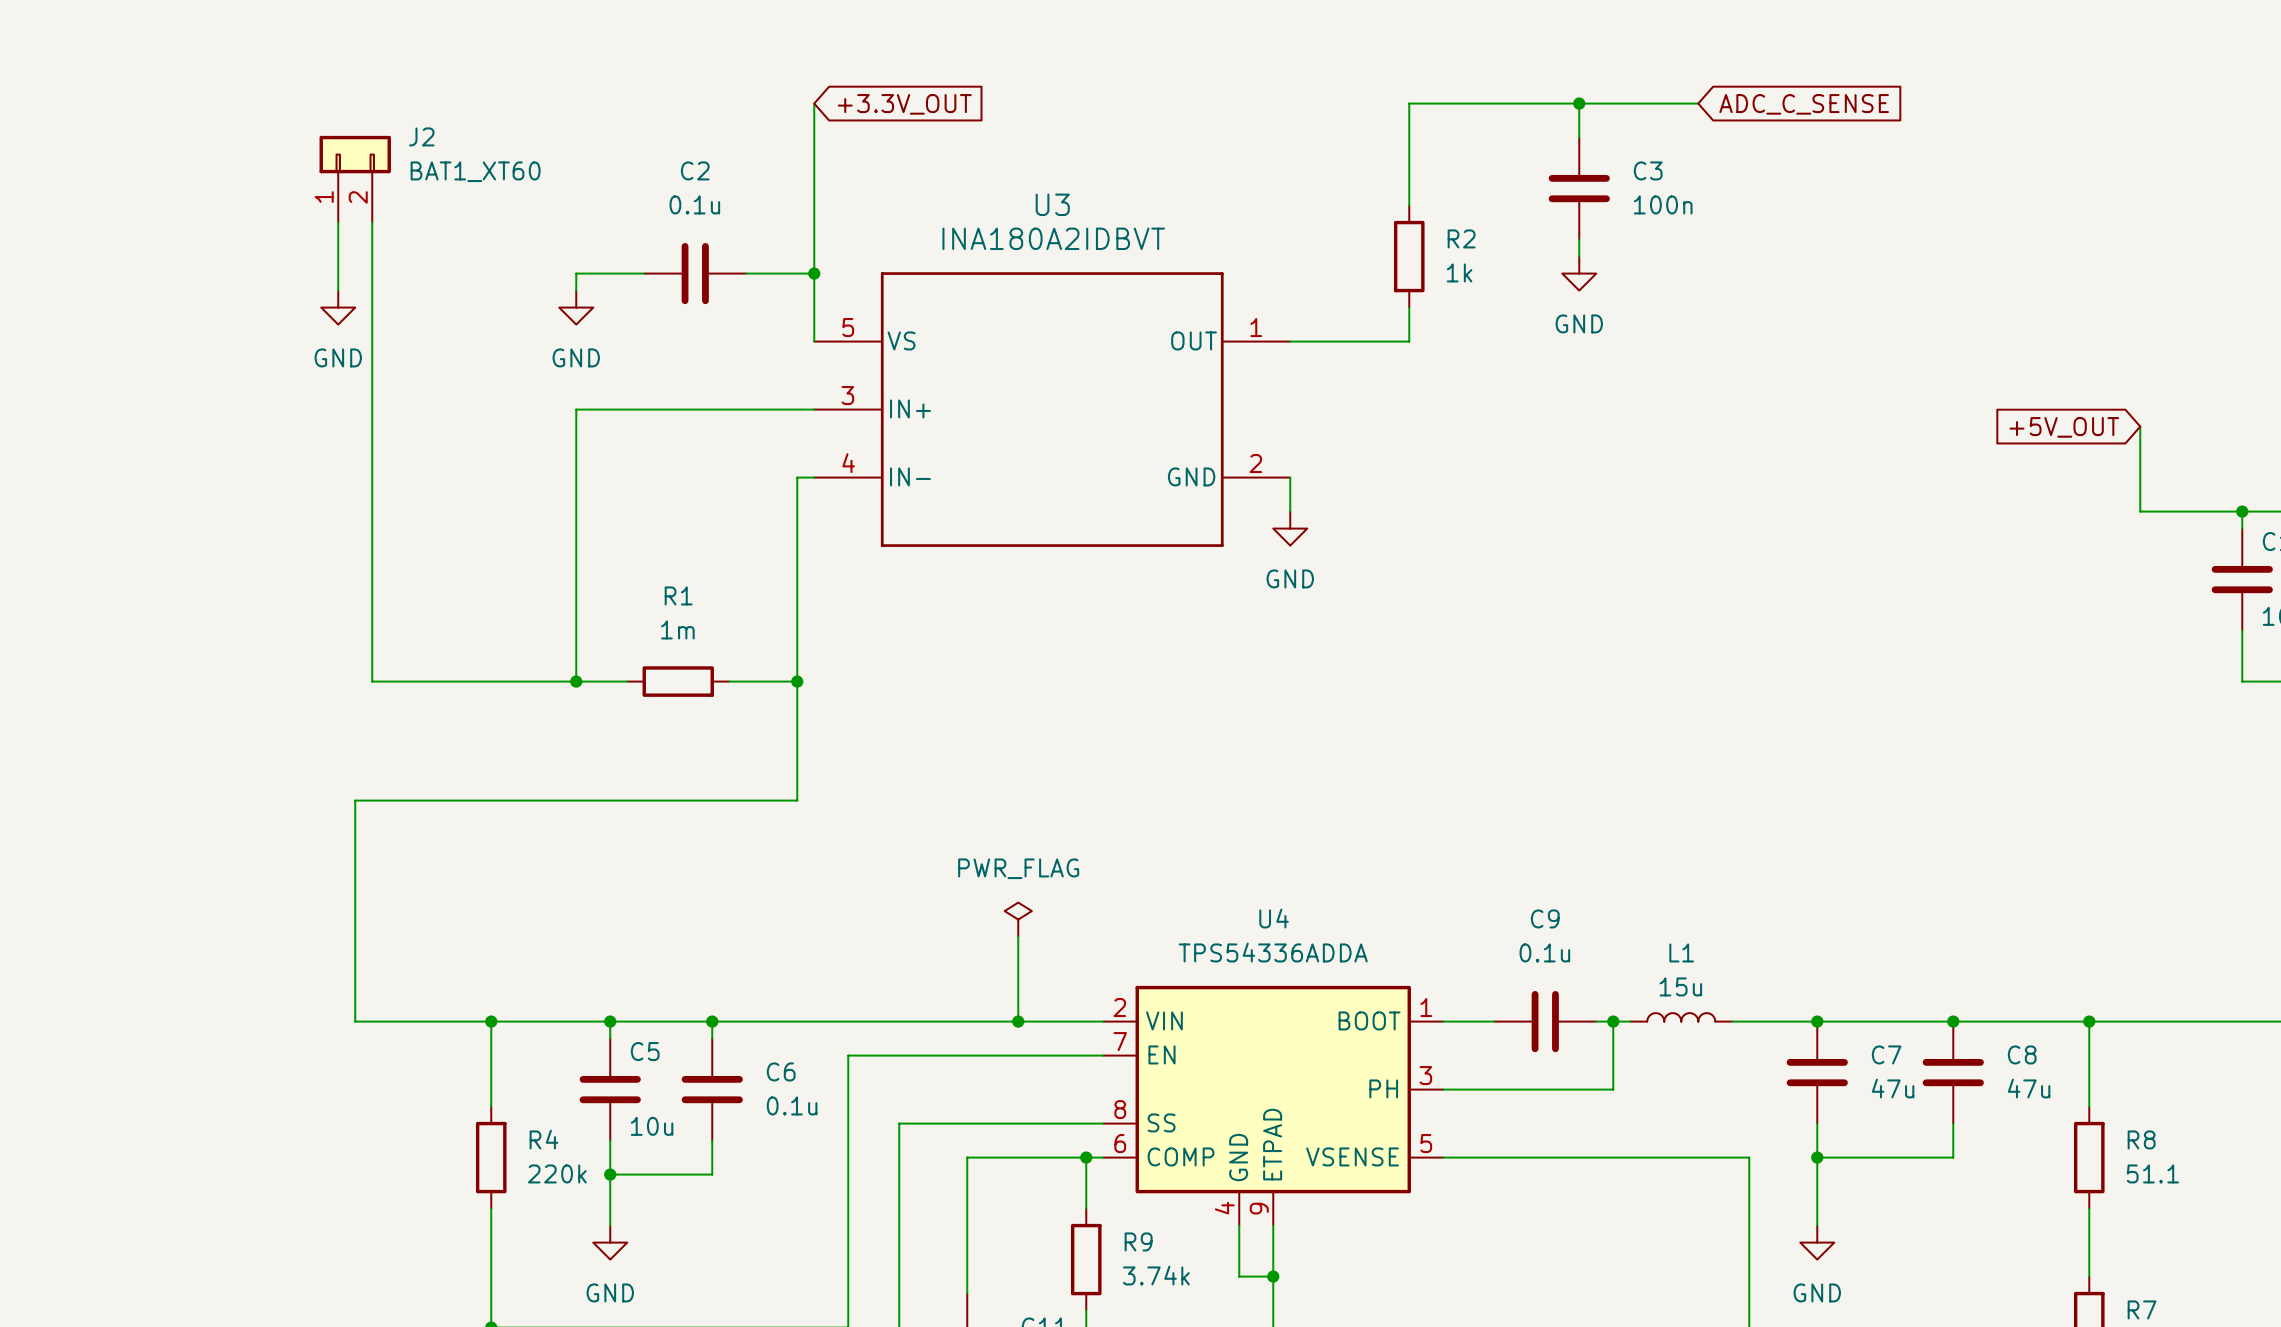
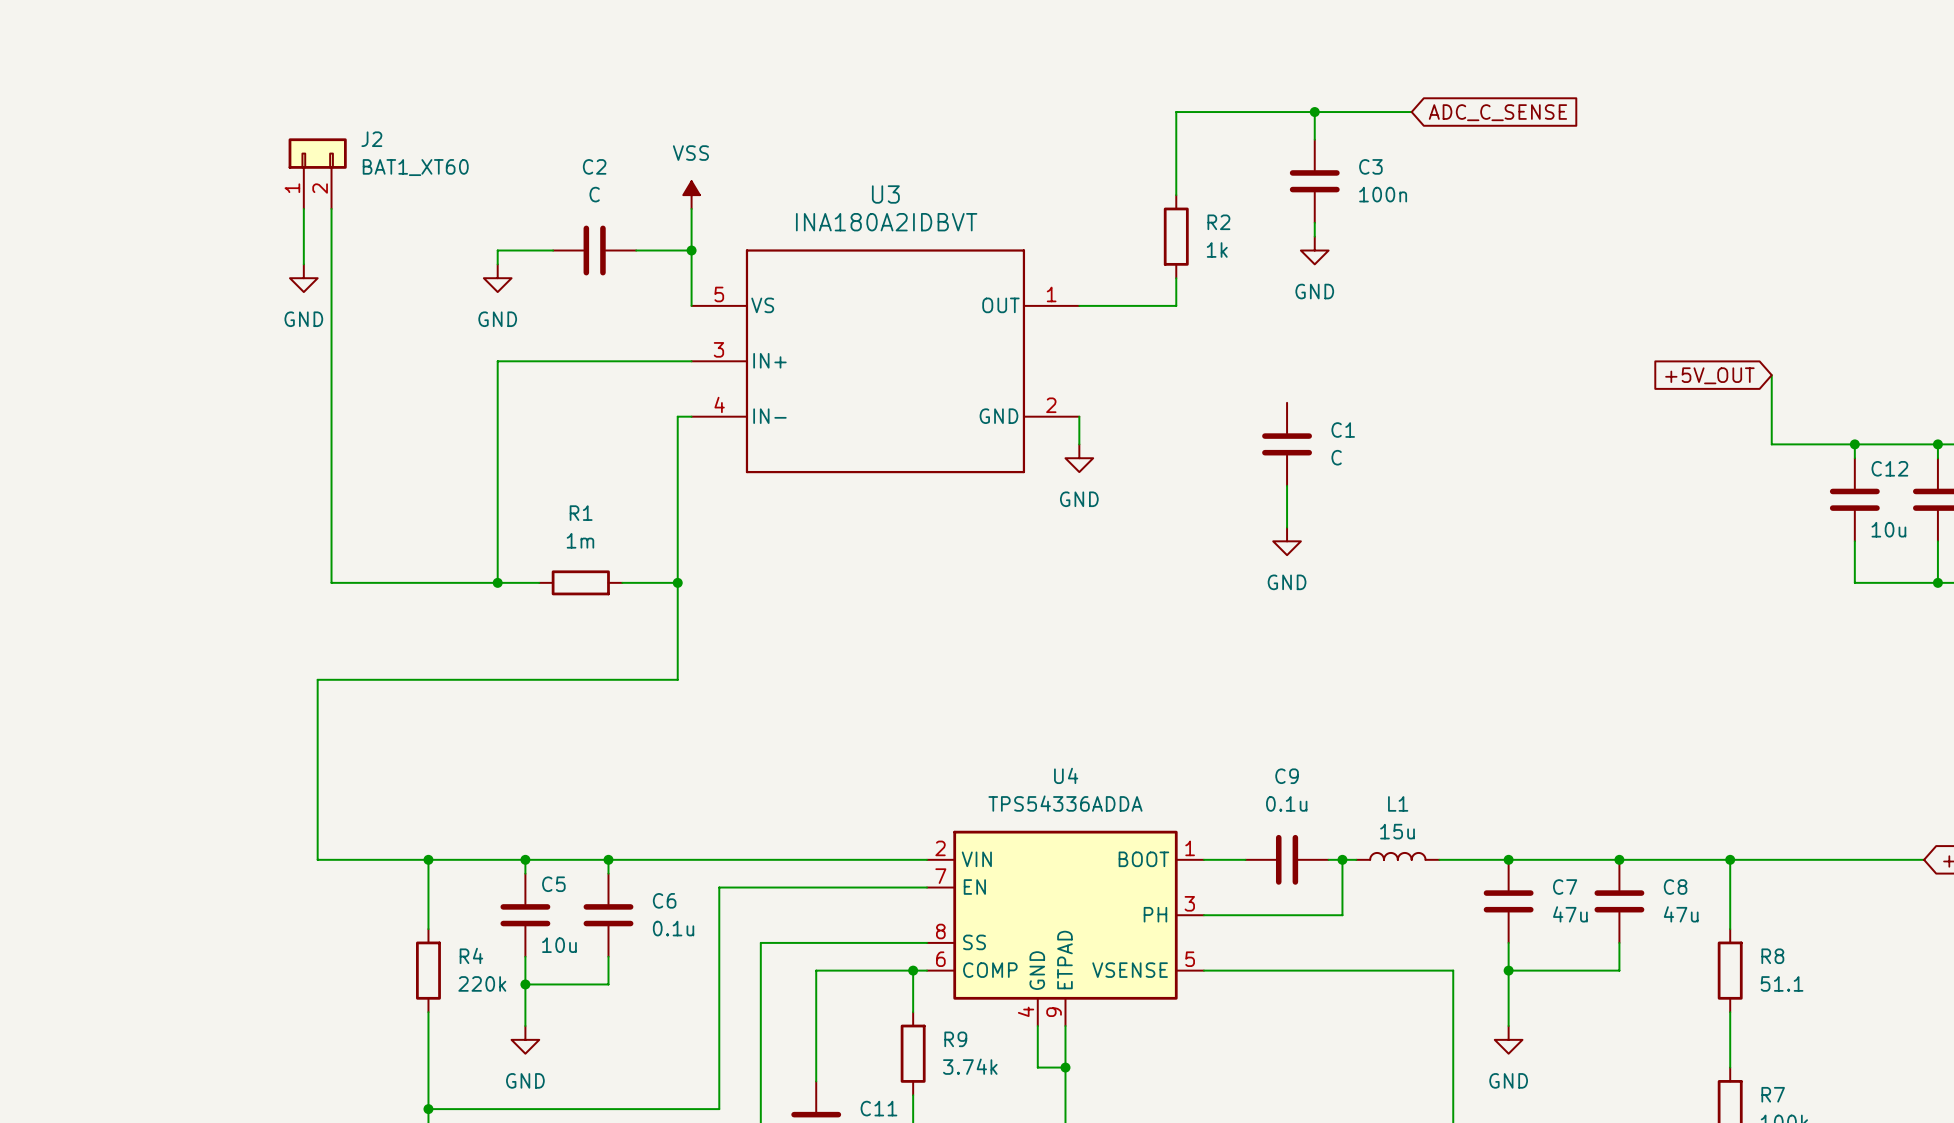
wire: (814, 103) (814, 222) -> none
global label: +3.3V_OUT (904, 104) -> none
C2 value: 0.1u (694, 204) -> C (594, 194)
power symbol: none -> VSS (691, 195)
C1: none -> C (1287, 444)
wire: none -> (1287, 485) (1287, 527)
power symbol: none -> GND (1287, 541)
power symbol: PWR_FLAG (1018, 919) -> none
wire: (1018, 936) (1018, 1021) -> none
junction: (1018, 1021) -> none

